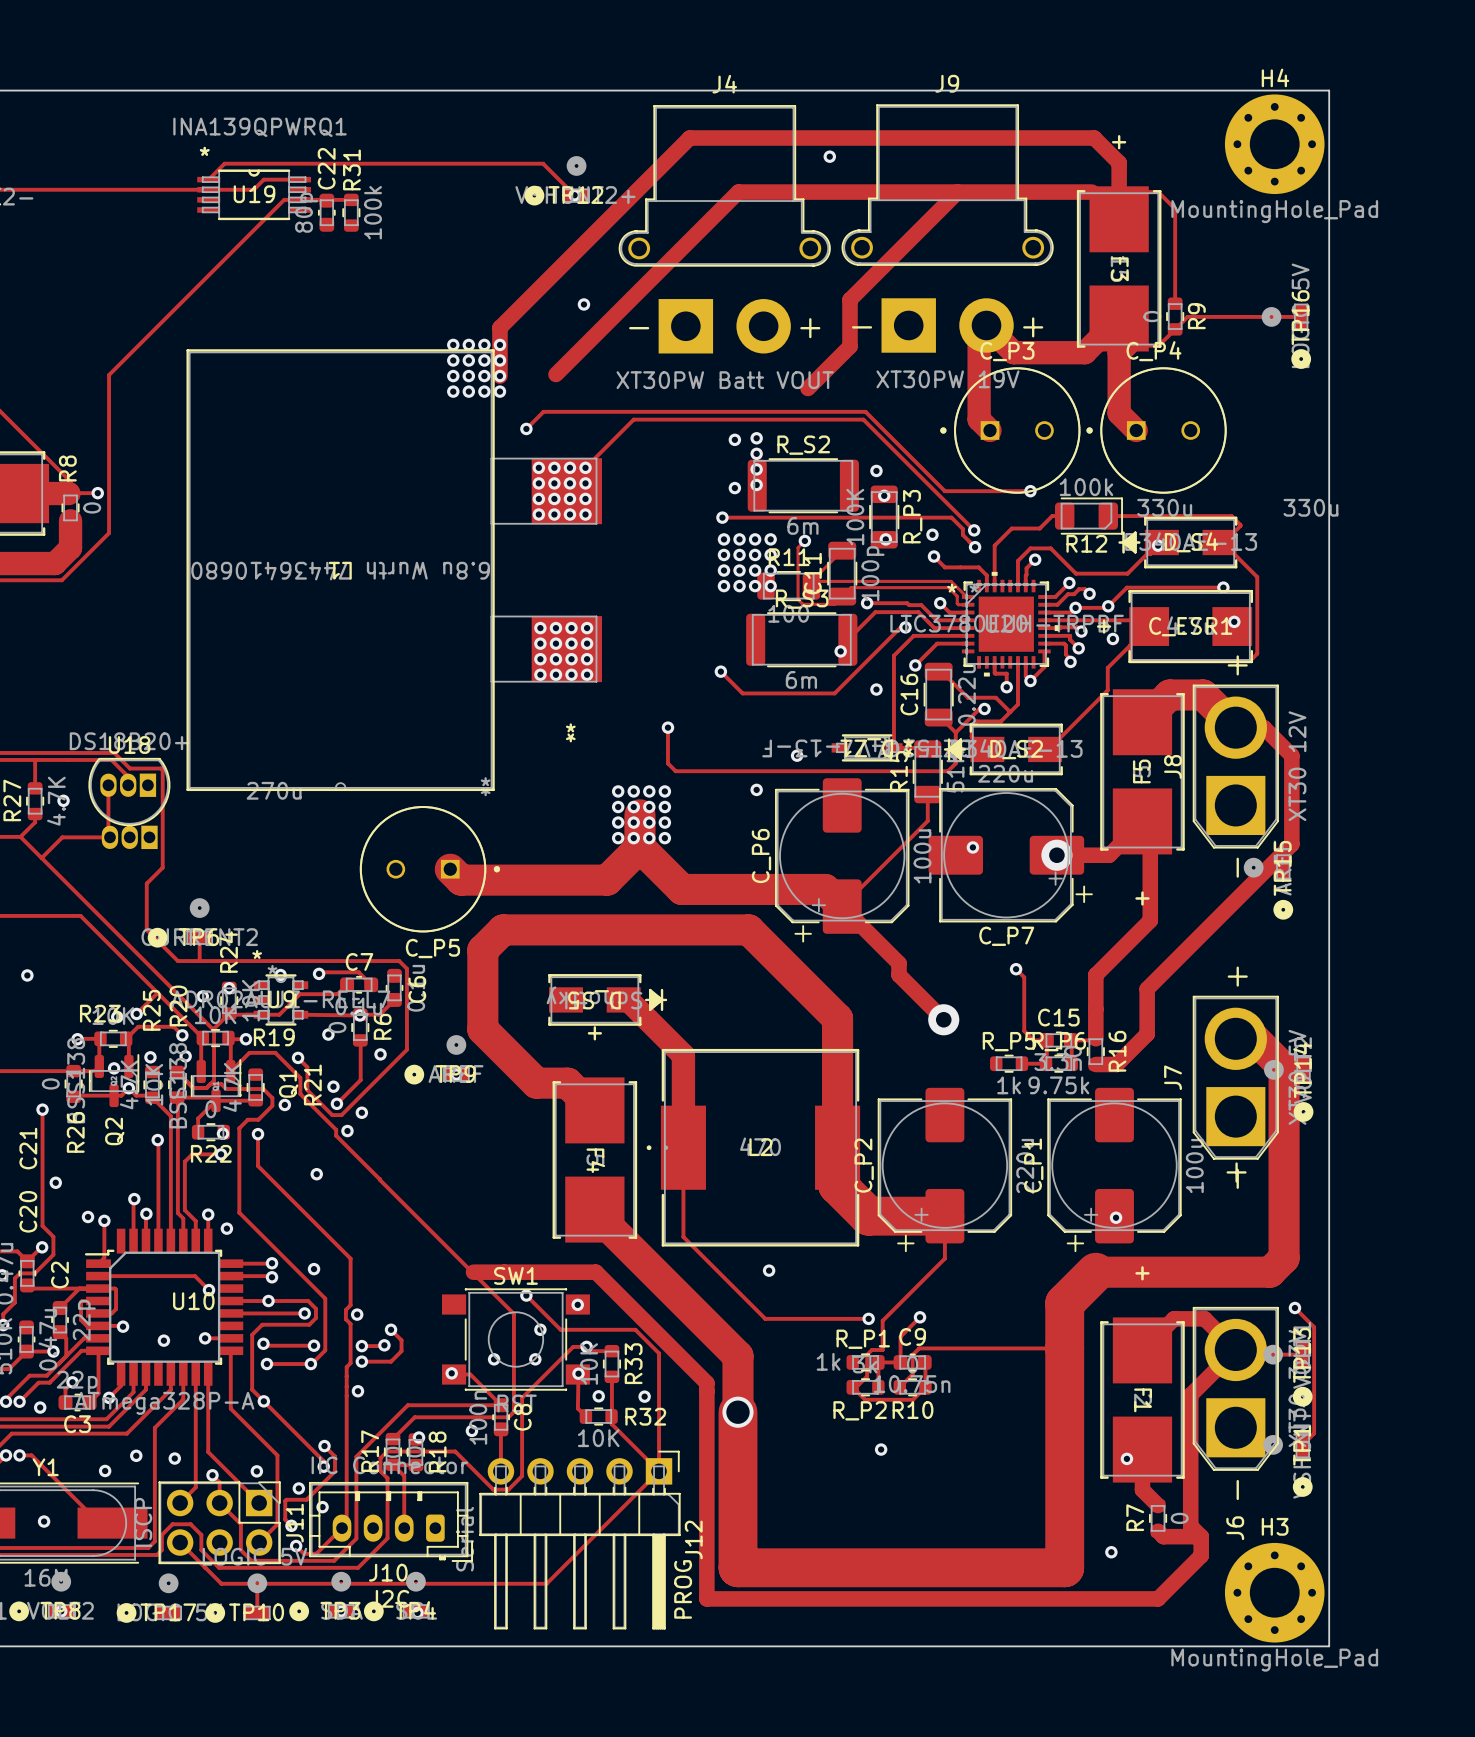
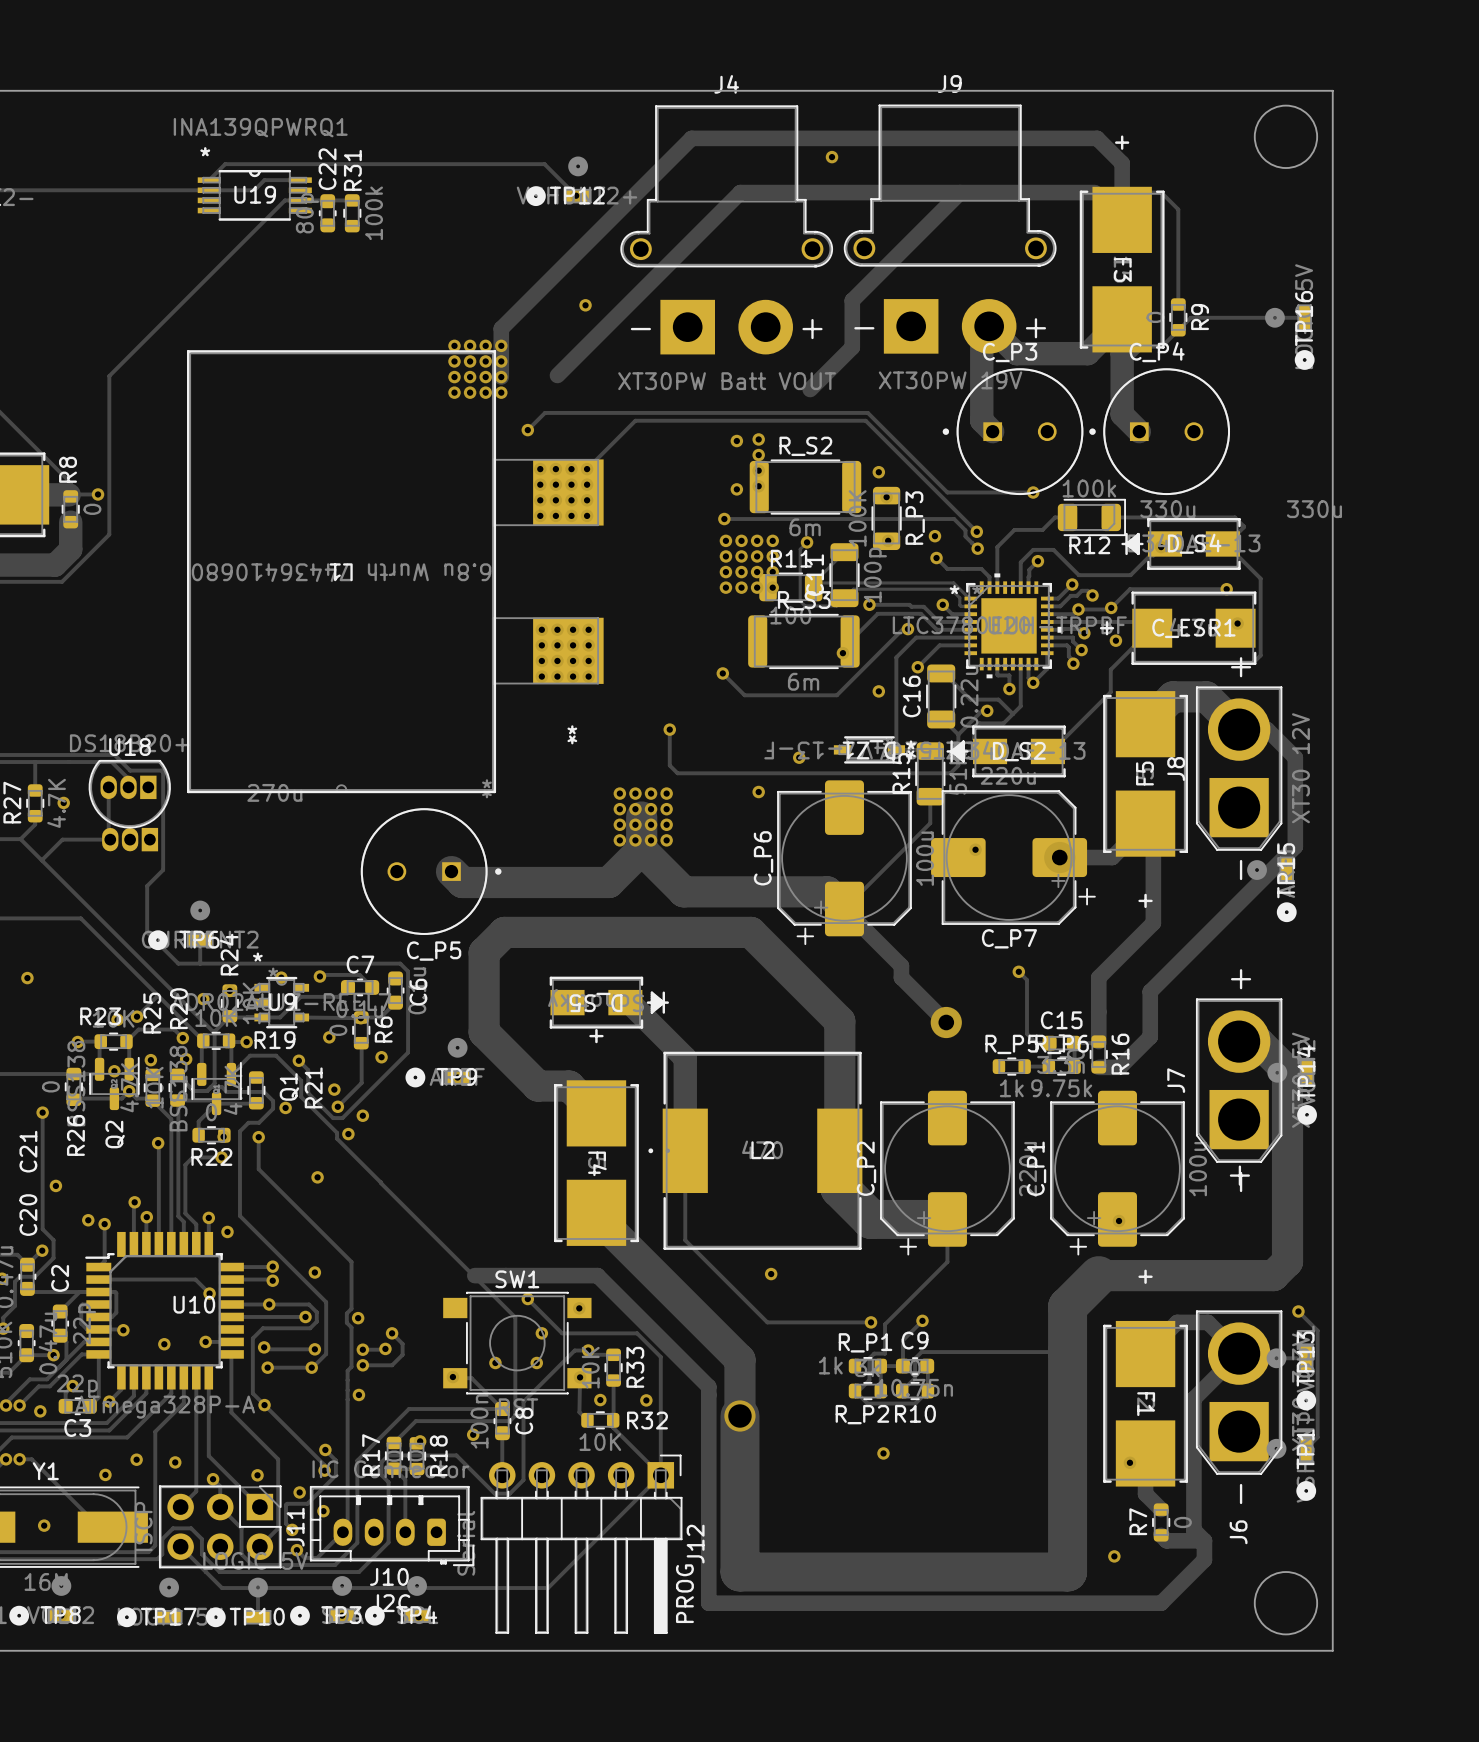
round board edge: none -> [1253, 104, 1318, 169]
H4: MountingHole_Pad (1274, 144) -> none
round board edge: none -> [1253, 1571, 1318, 1636]
H3: MountingHole_Pad (1274, 1592) -> none

